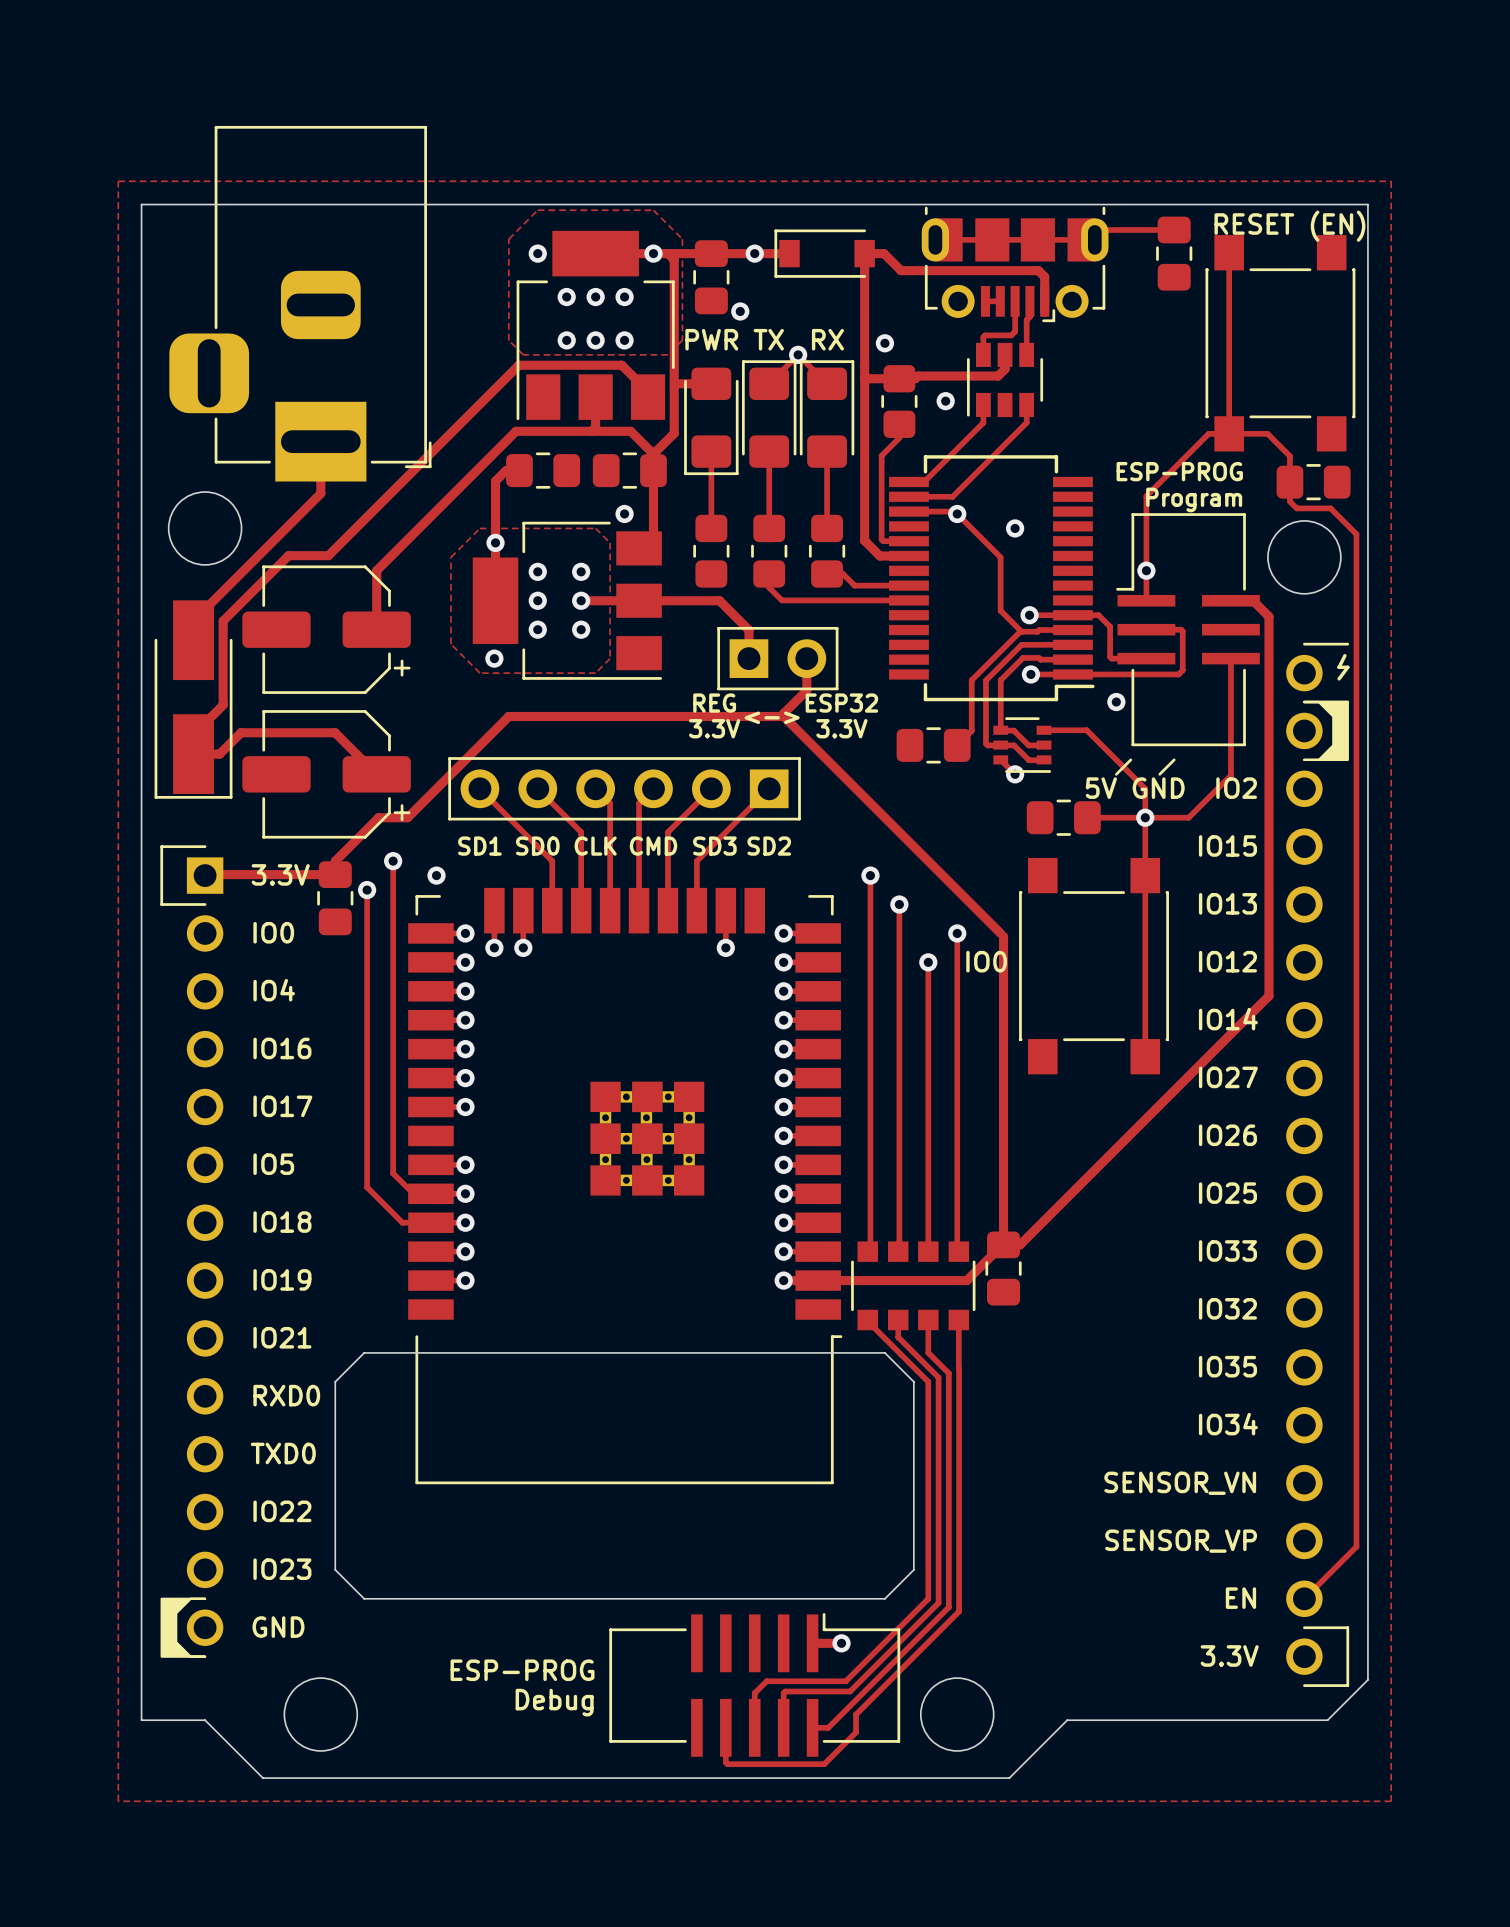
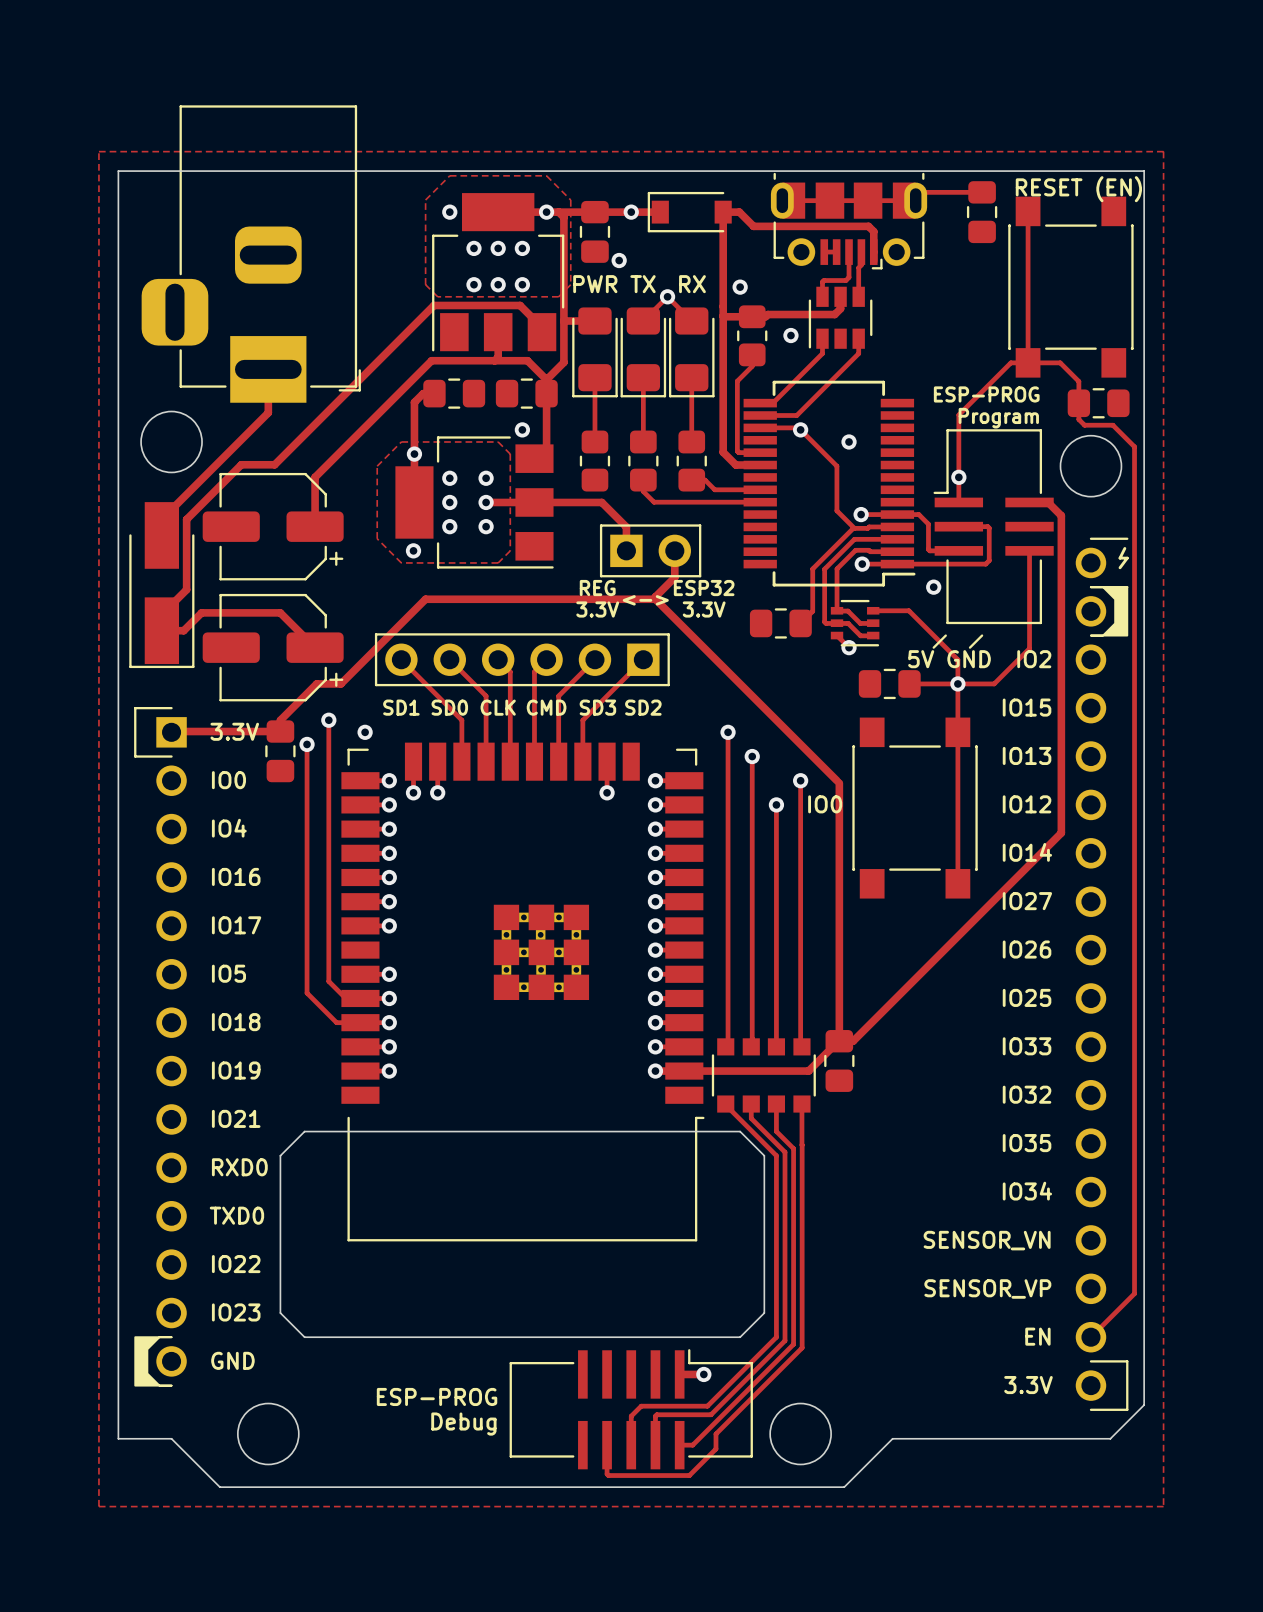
part rotation: 0° (769, 414) -> 180° (643, 352)
part rotation: 0° (827, 414) -> 180° (691, 352)

